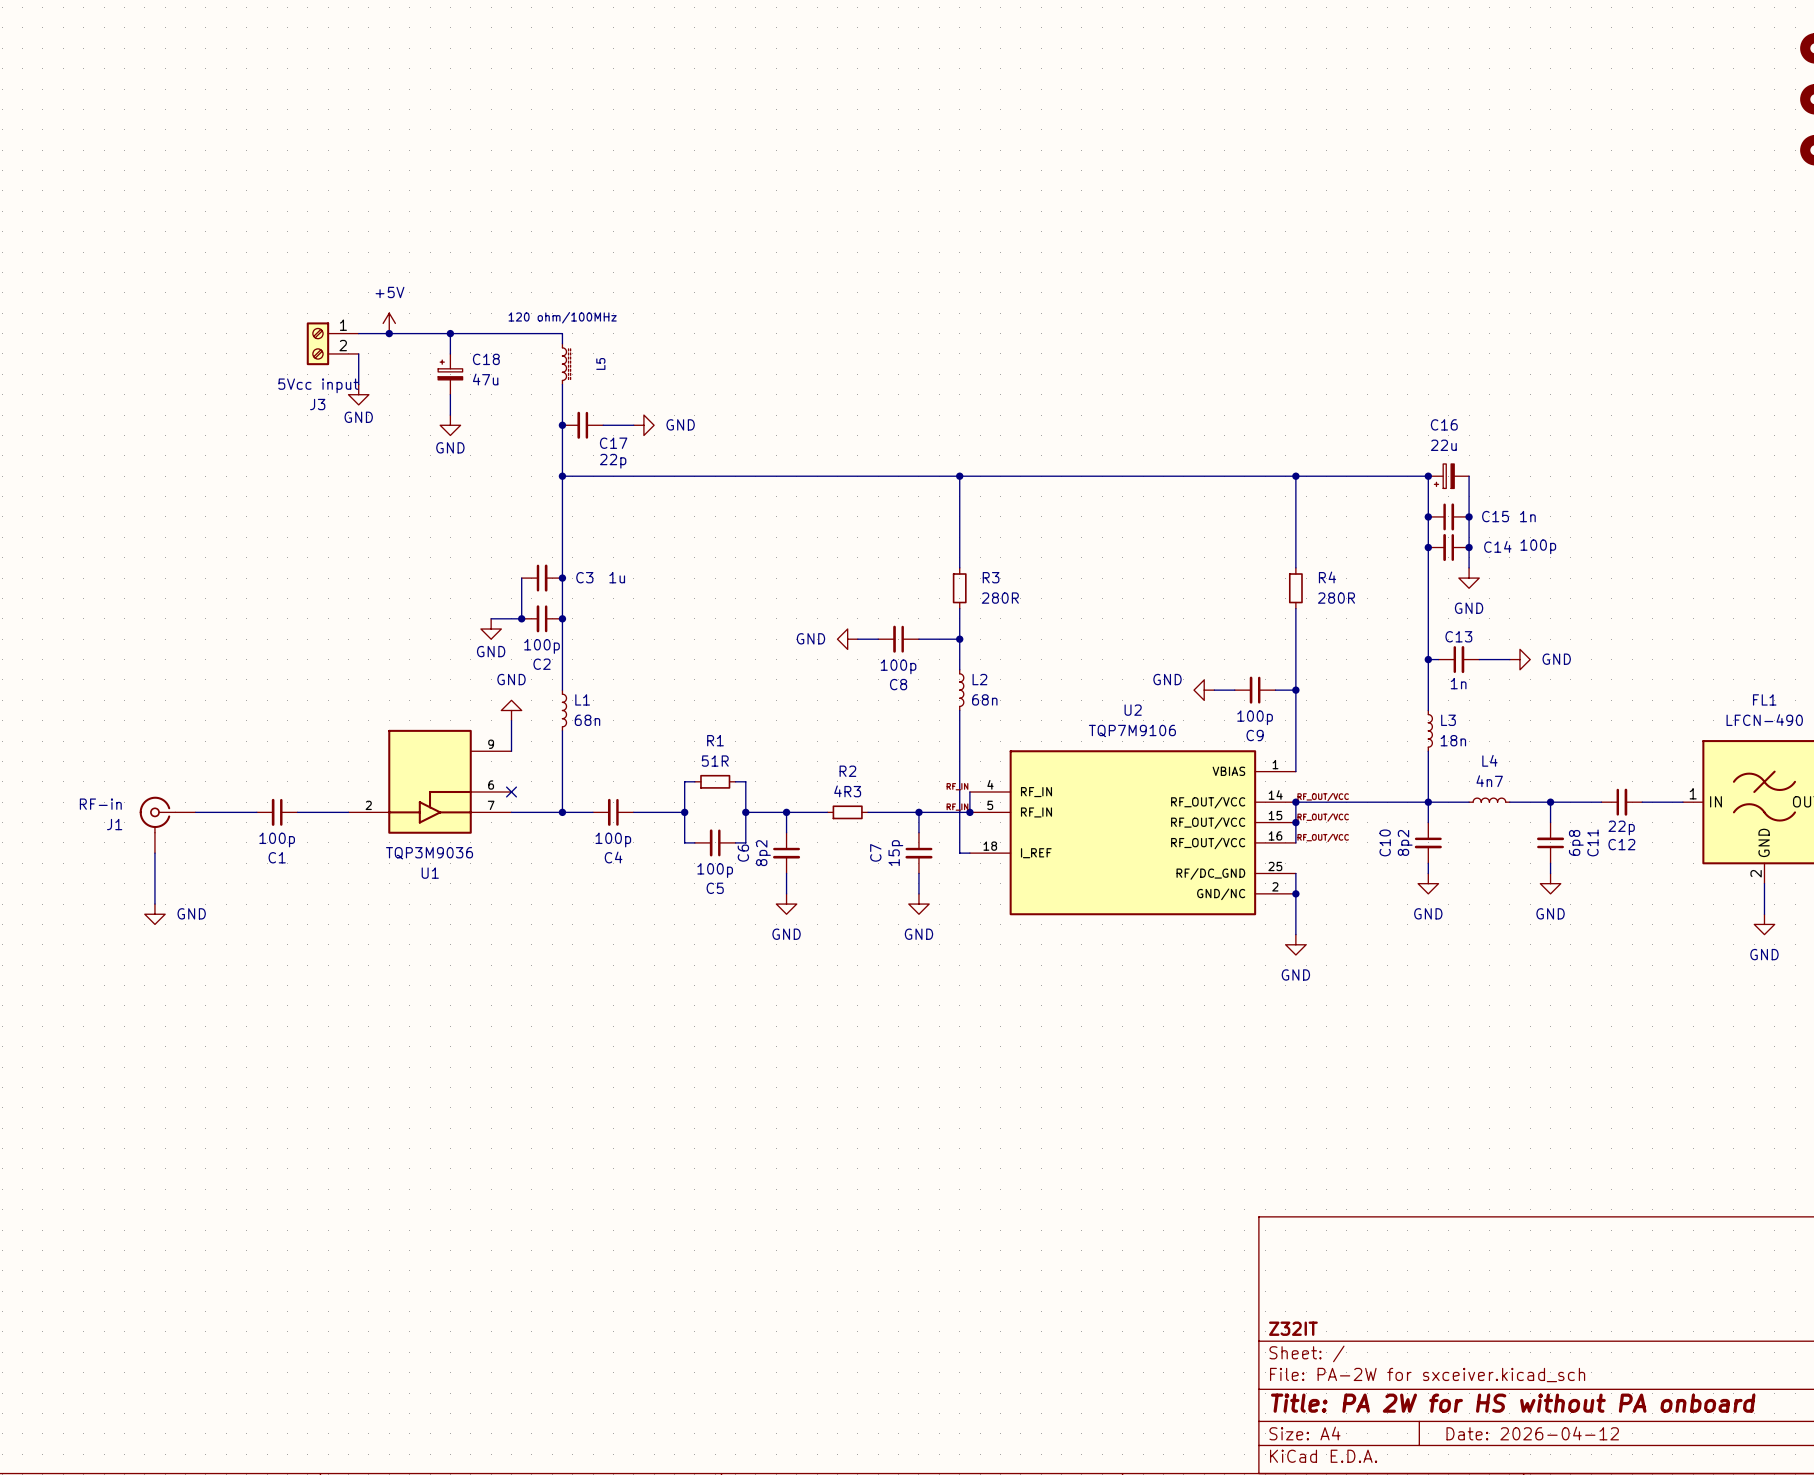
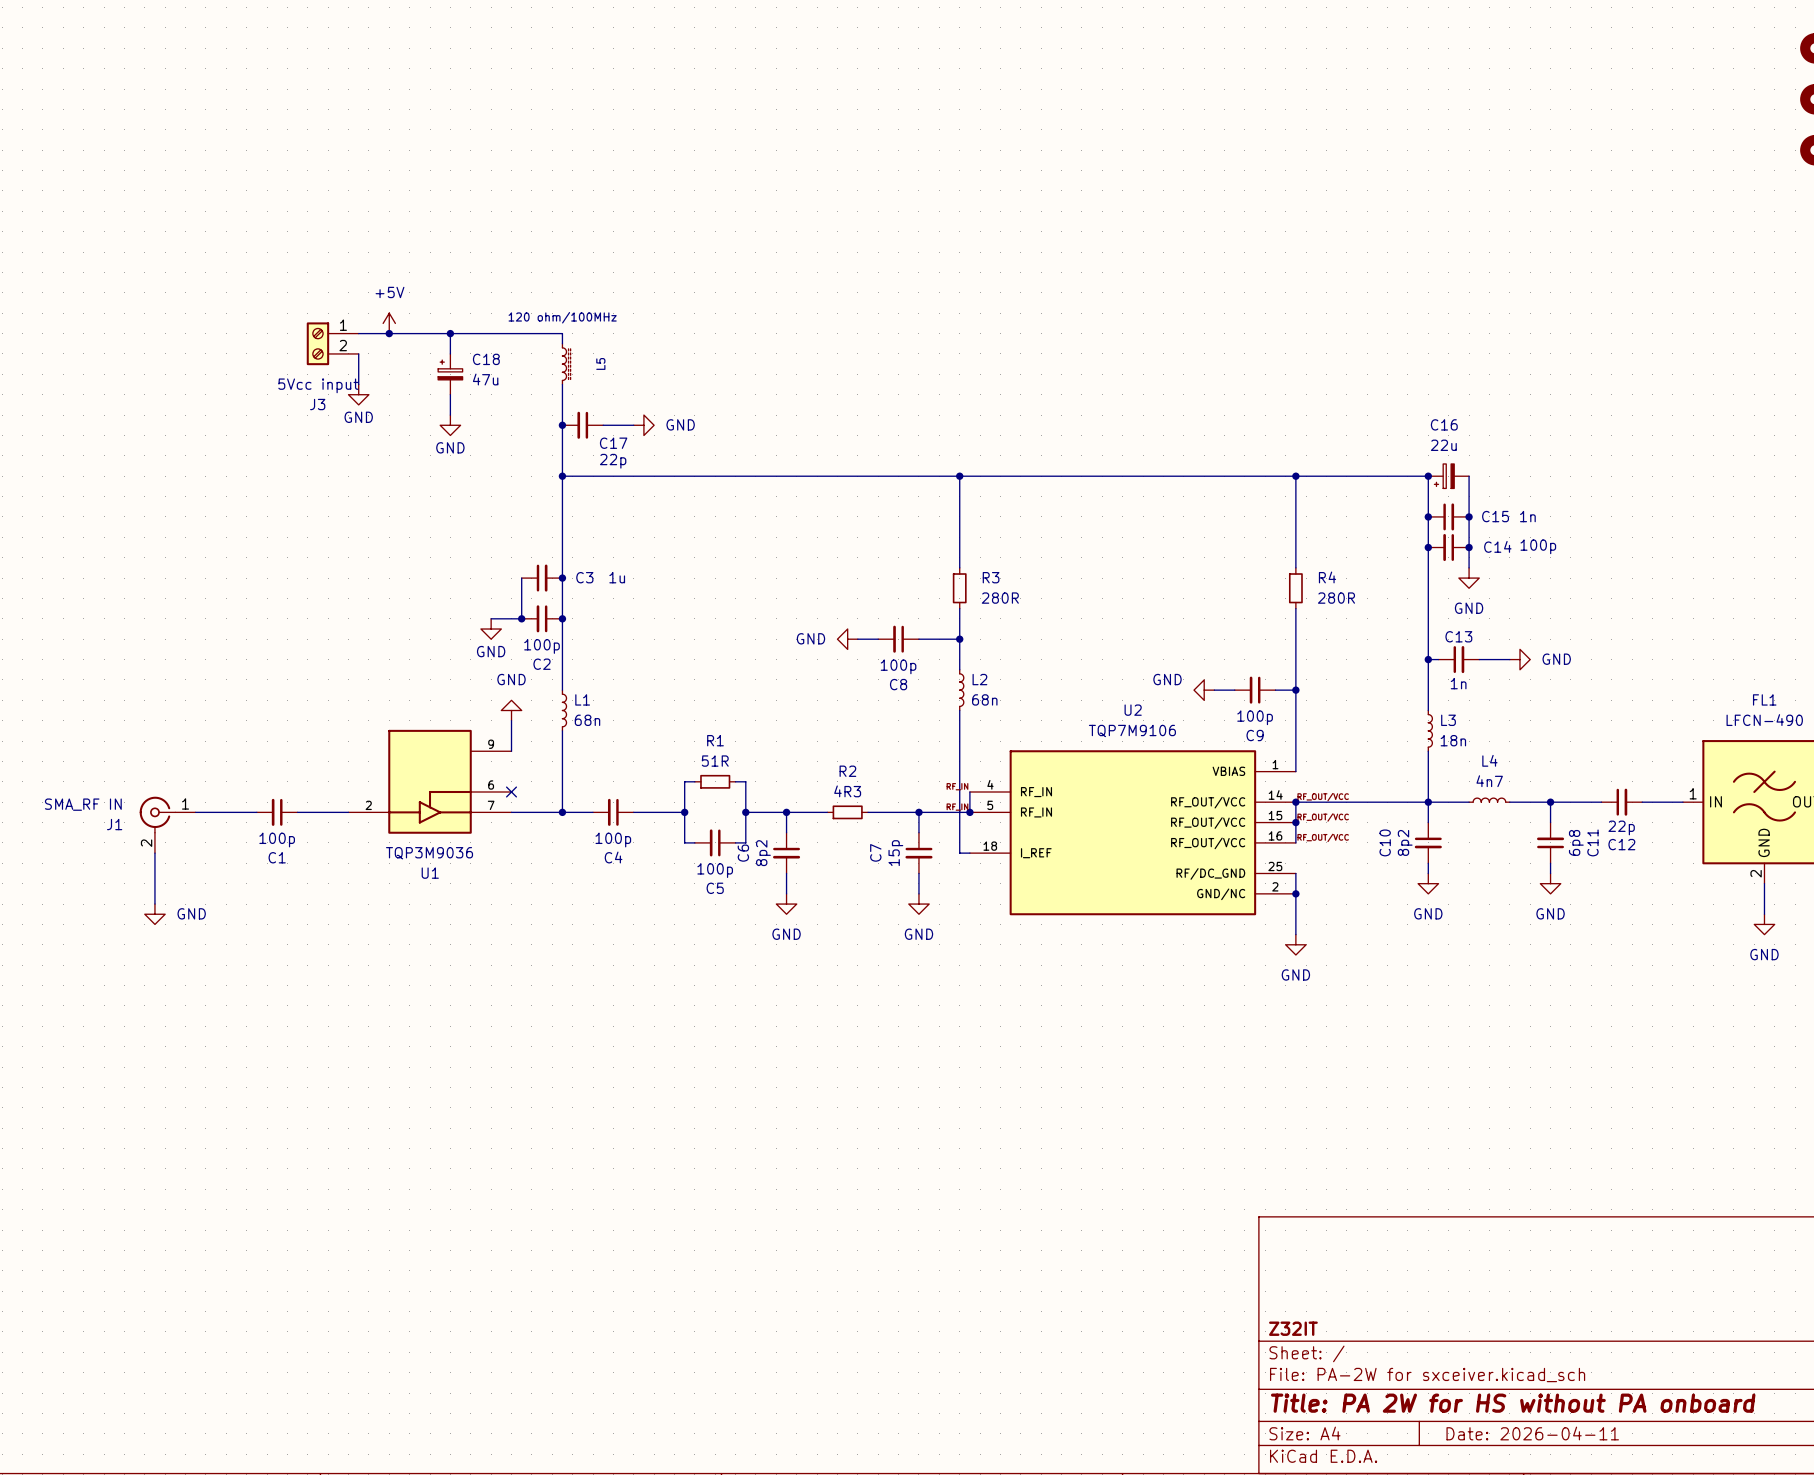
J1 pin number: none -> 1 (185, 803)
J1 value: RF-in (100, 804) -> SMA_RF IN (83, 804)
J1 pin number: none -> 2 (146, 843)
title block: Date: 2026-04-12 (1532, 1433) -> Date: 2026-04-11 (1532, 1433)

